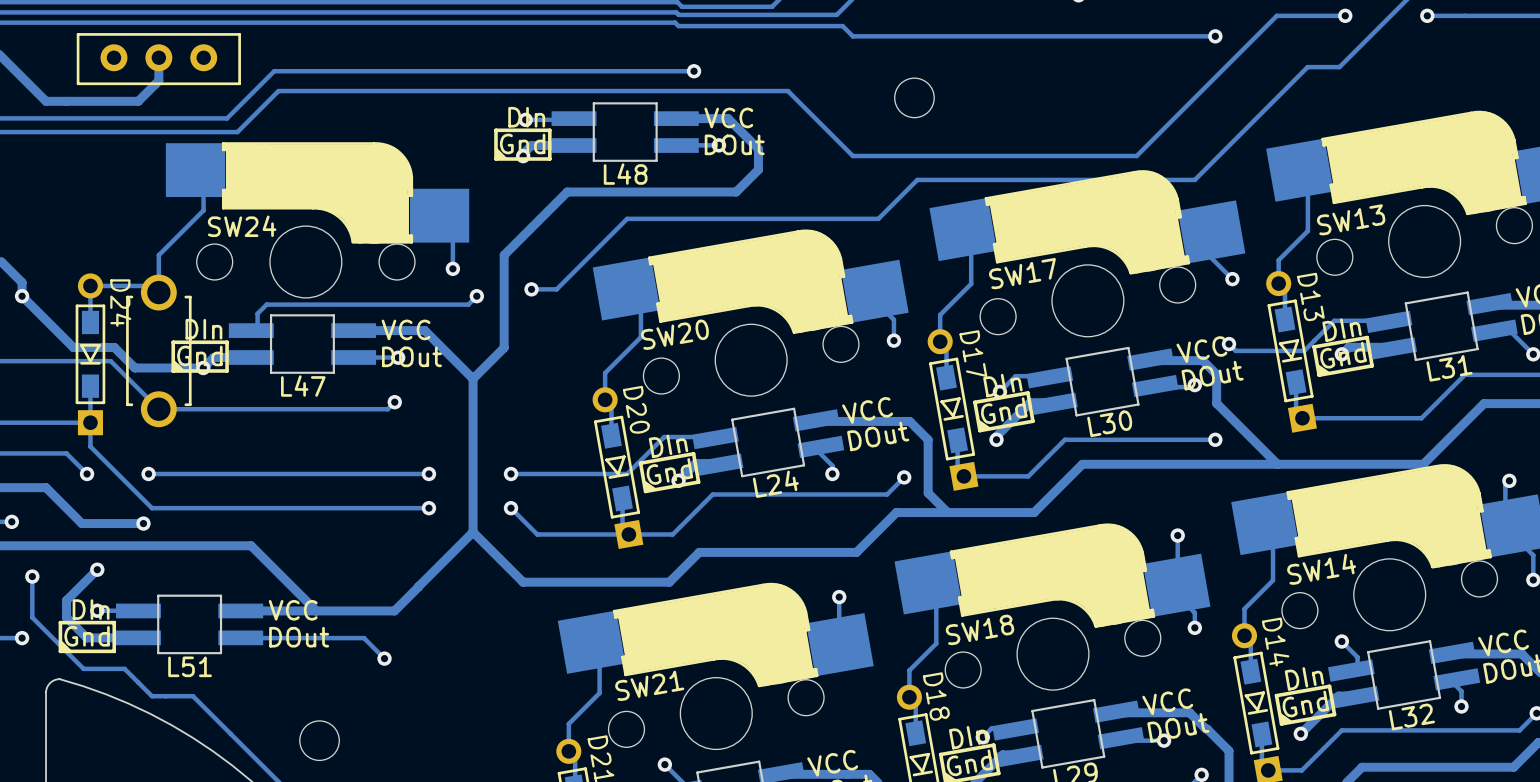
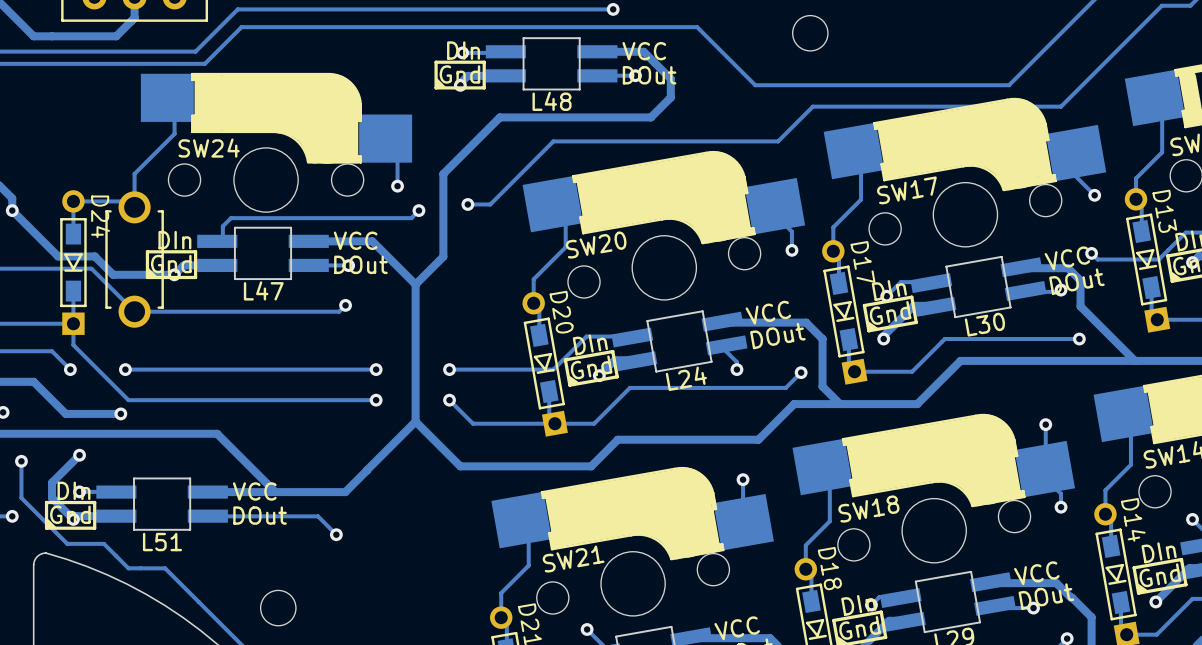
via: none -> (73, 519)

